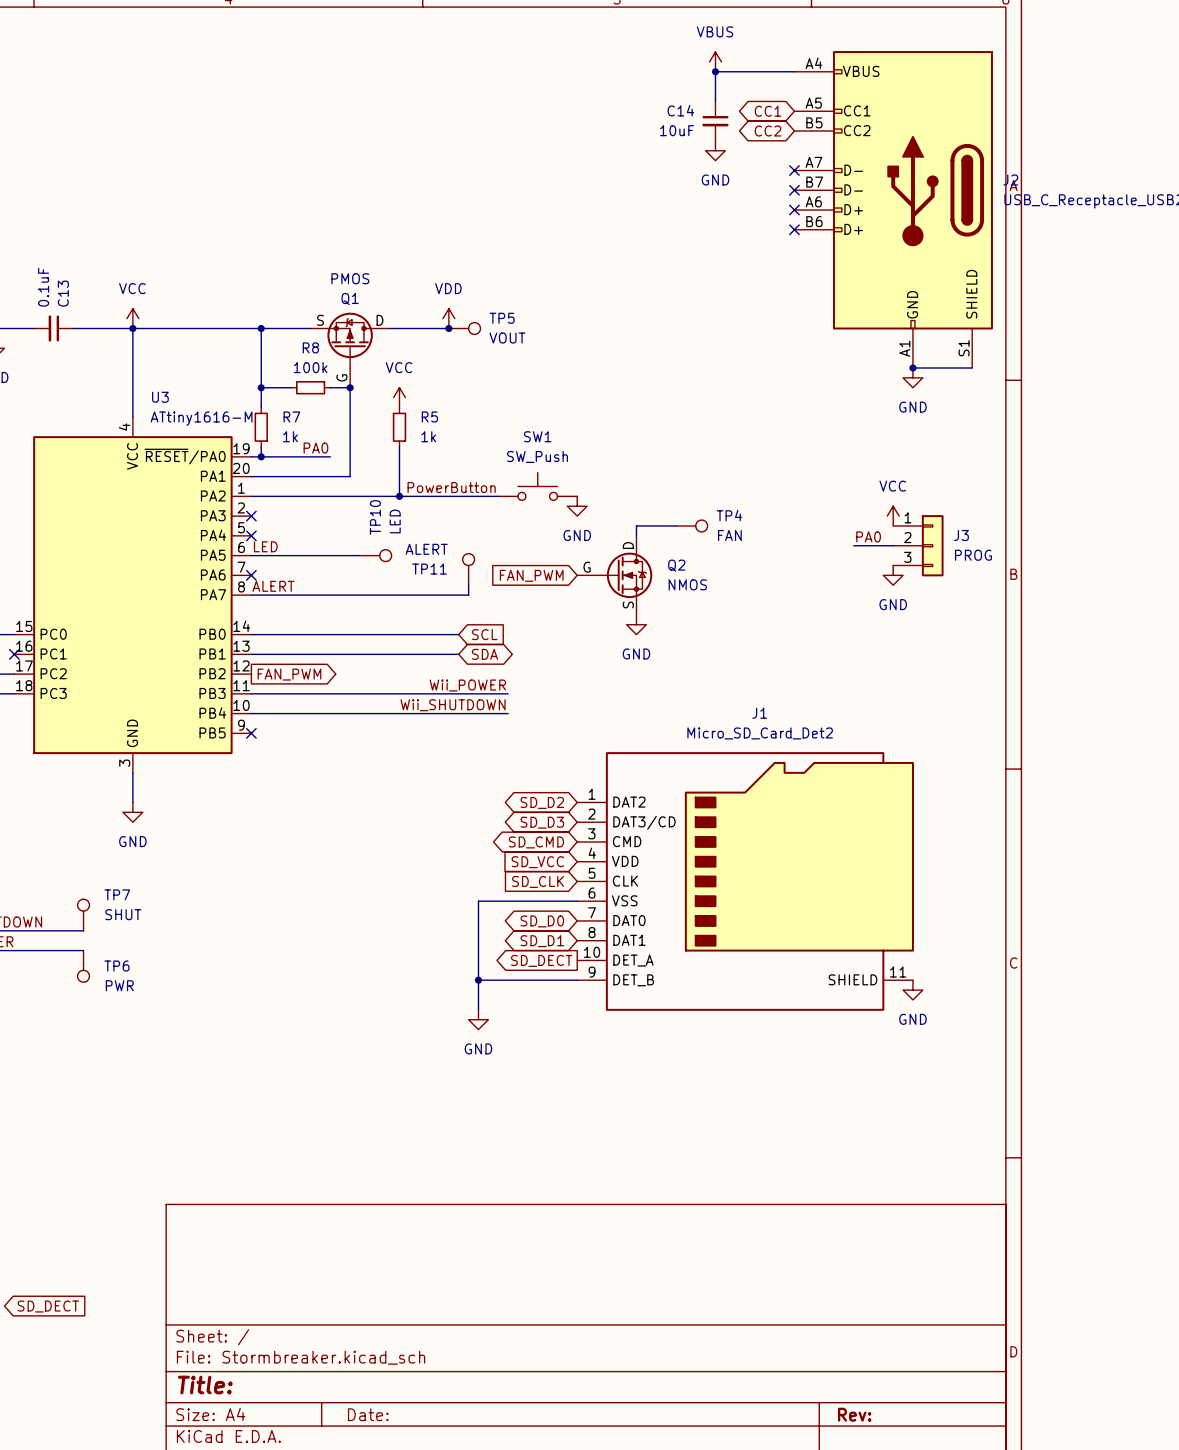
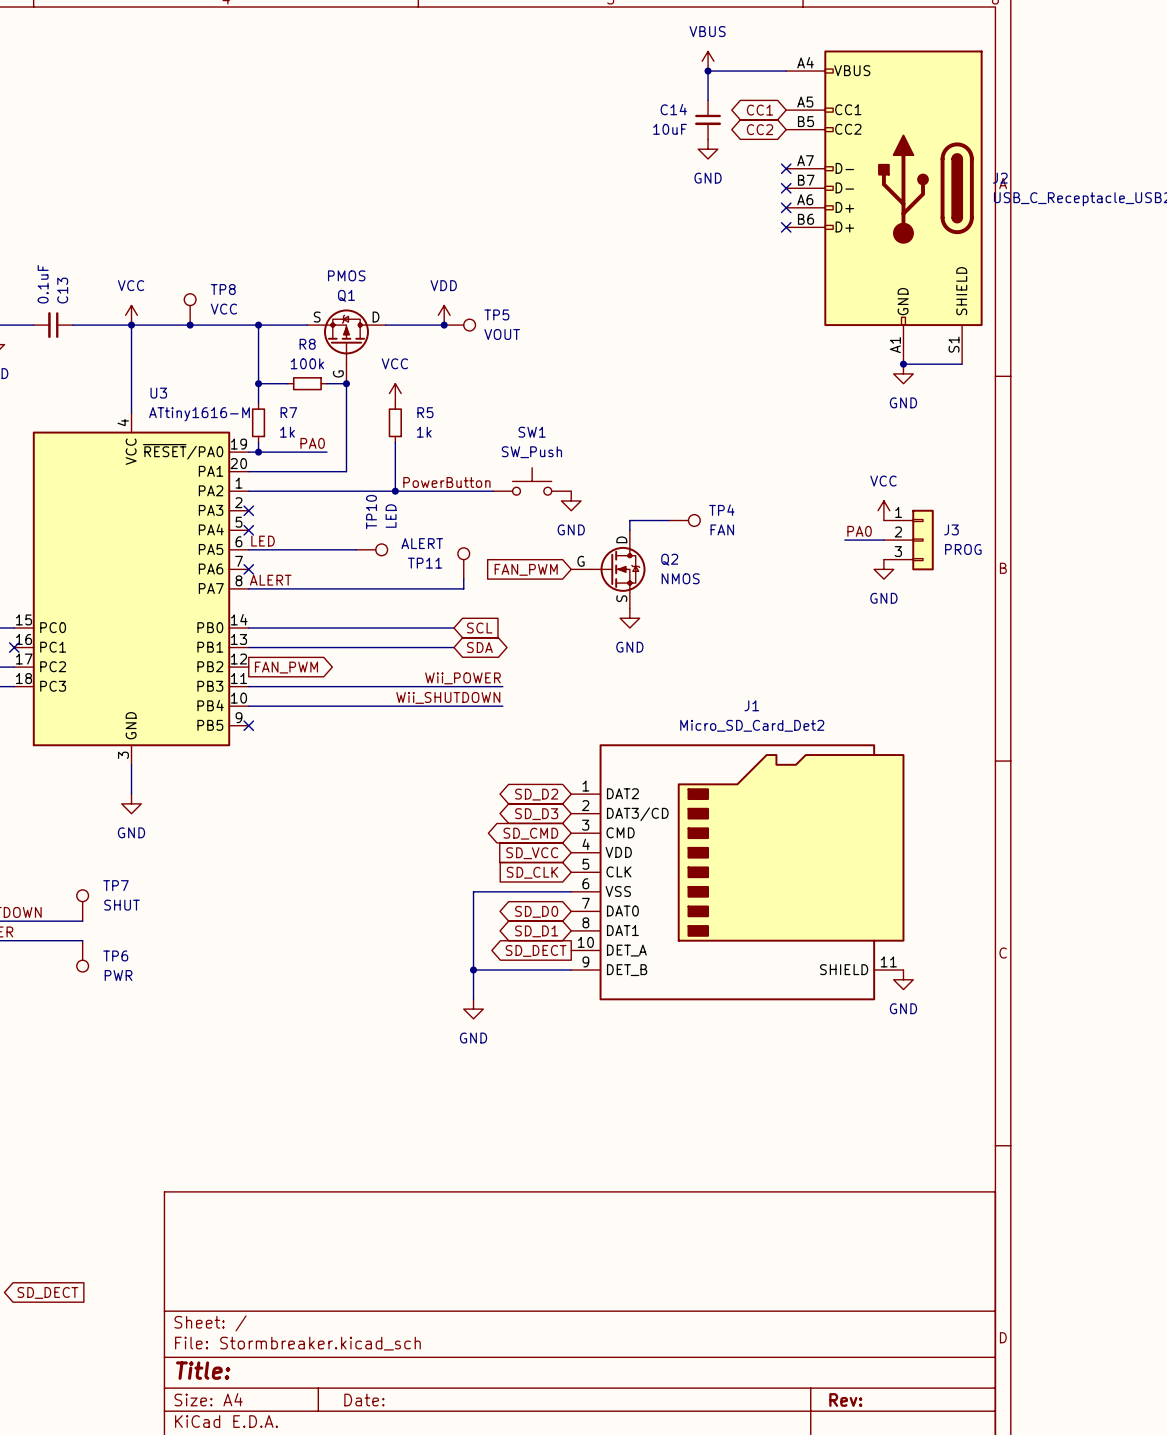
TP8: none -> VCC (190, 309)
junction: none -> (190, 325)

